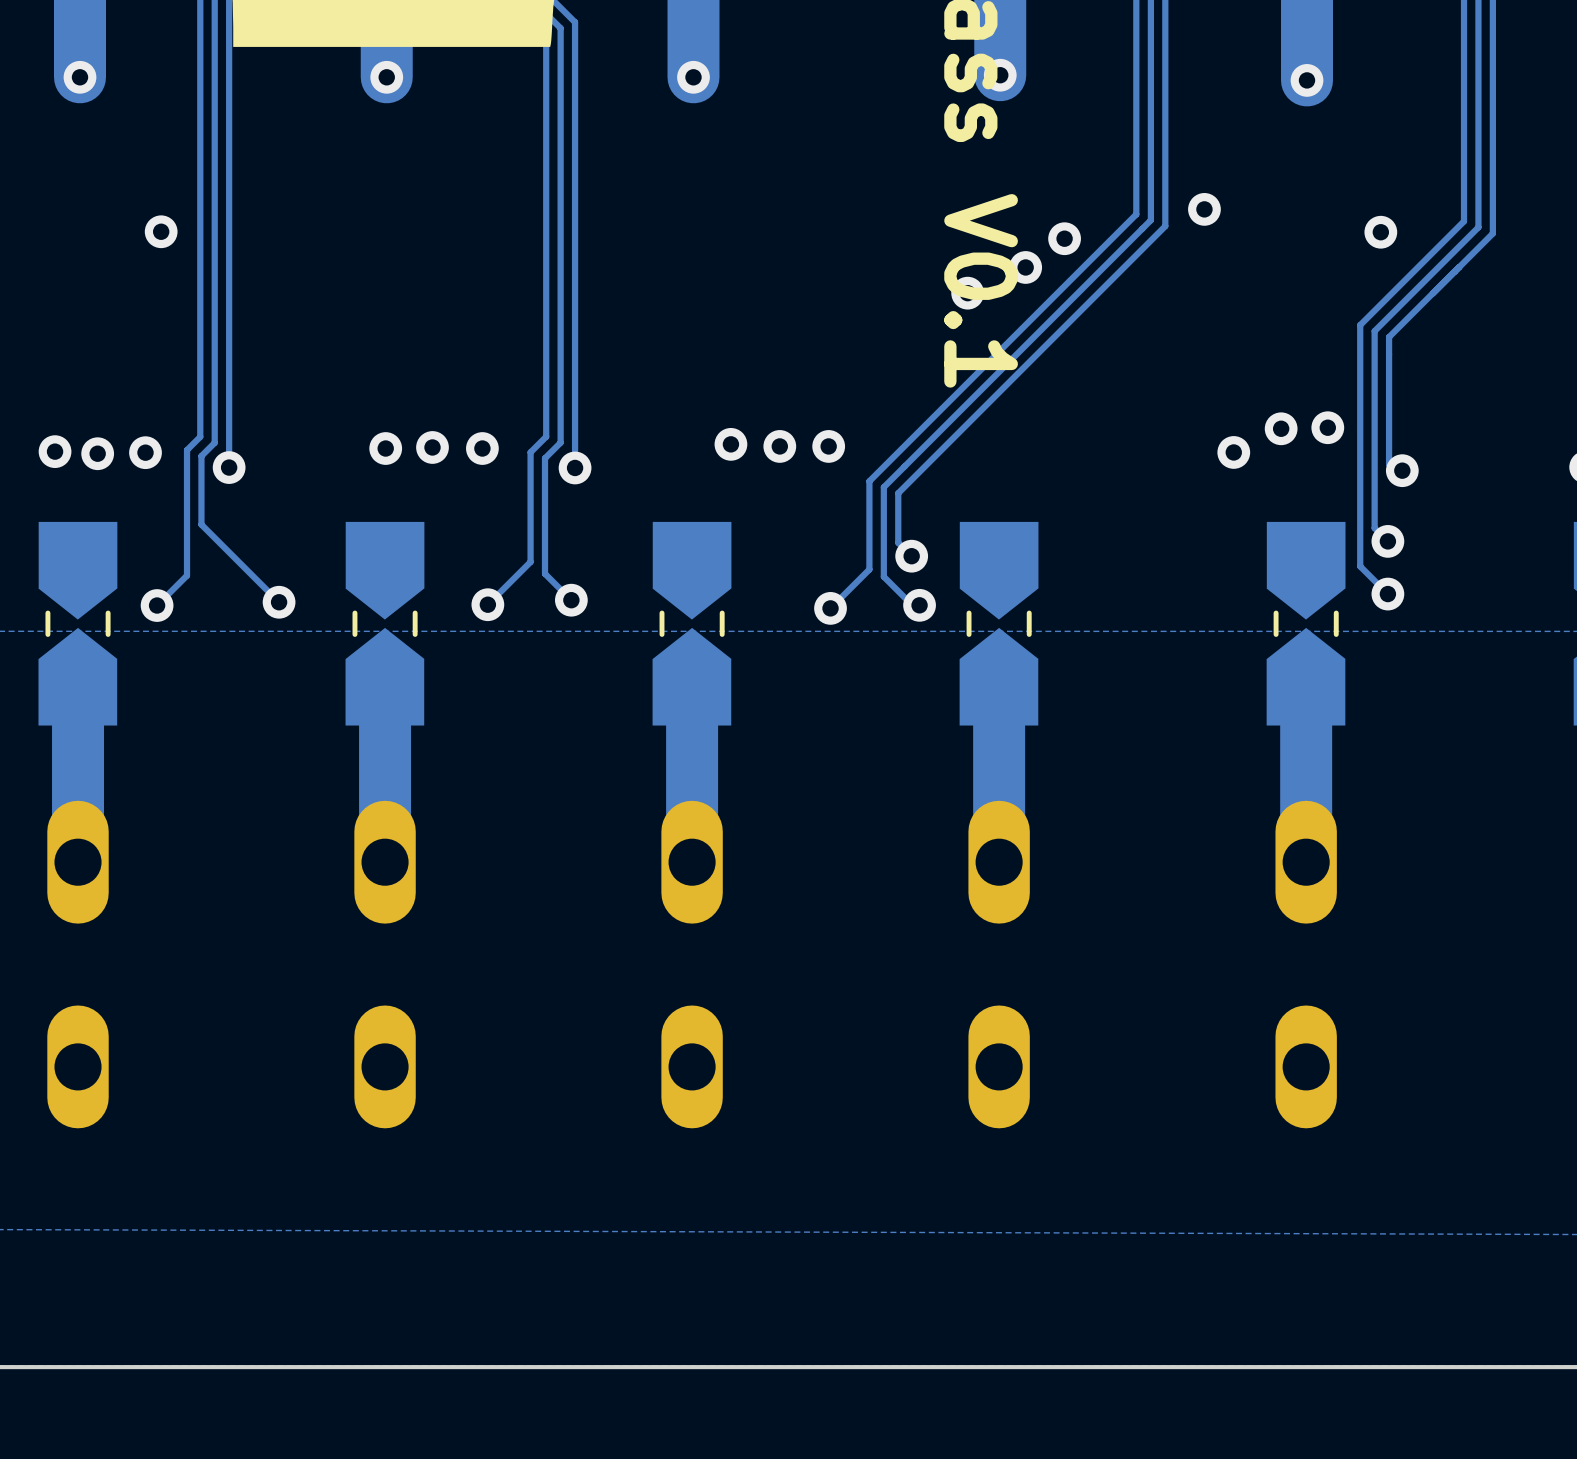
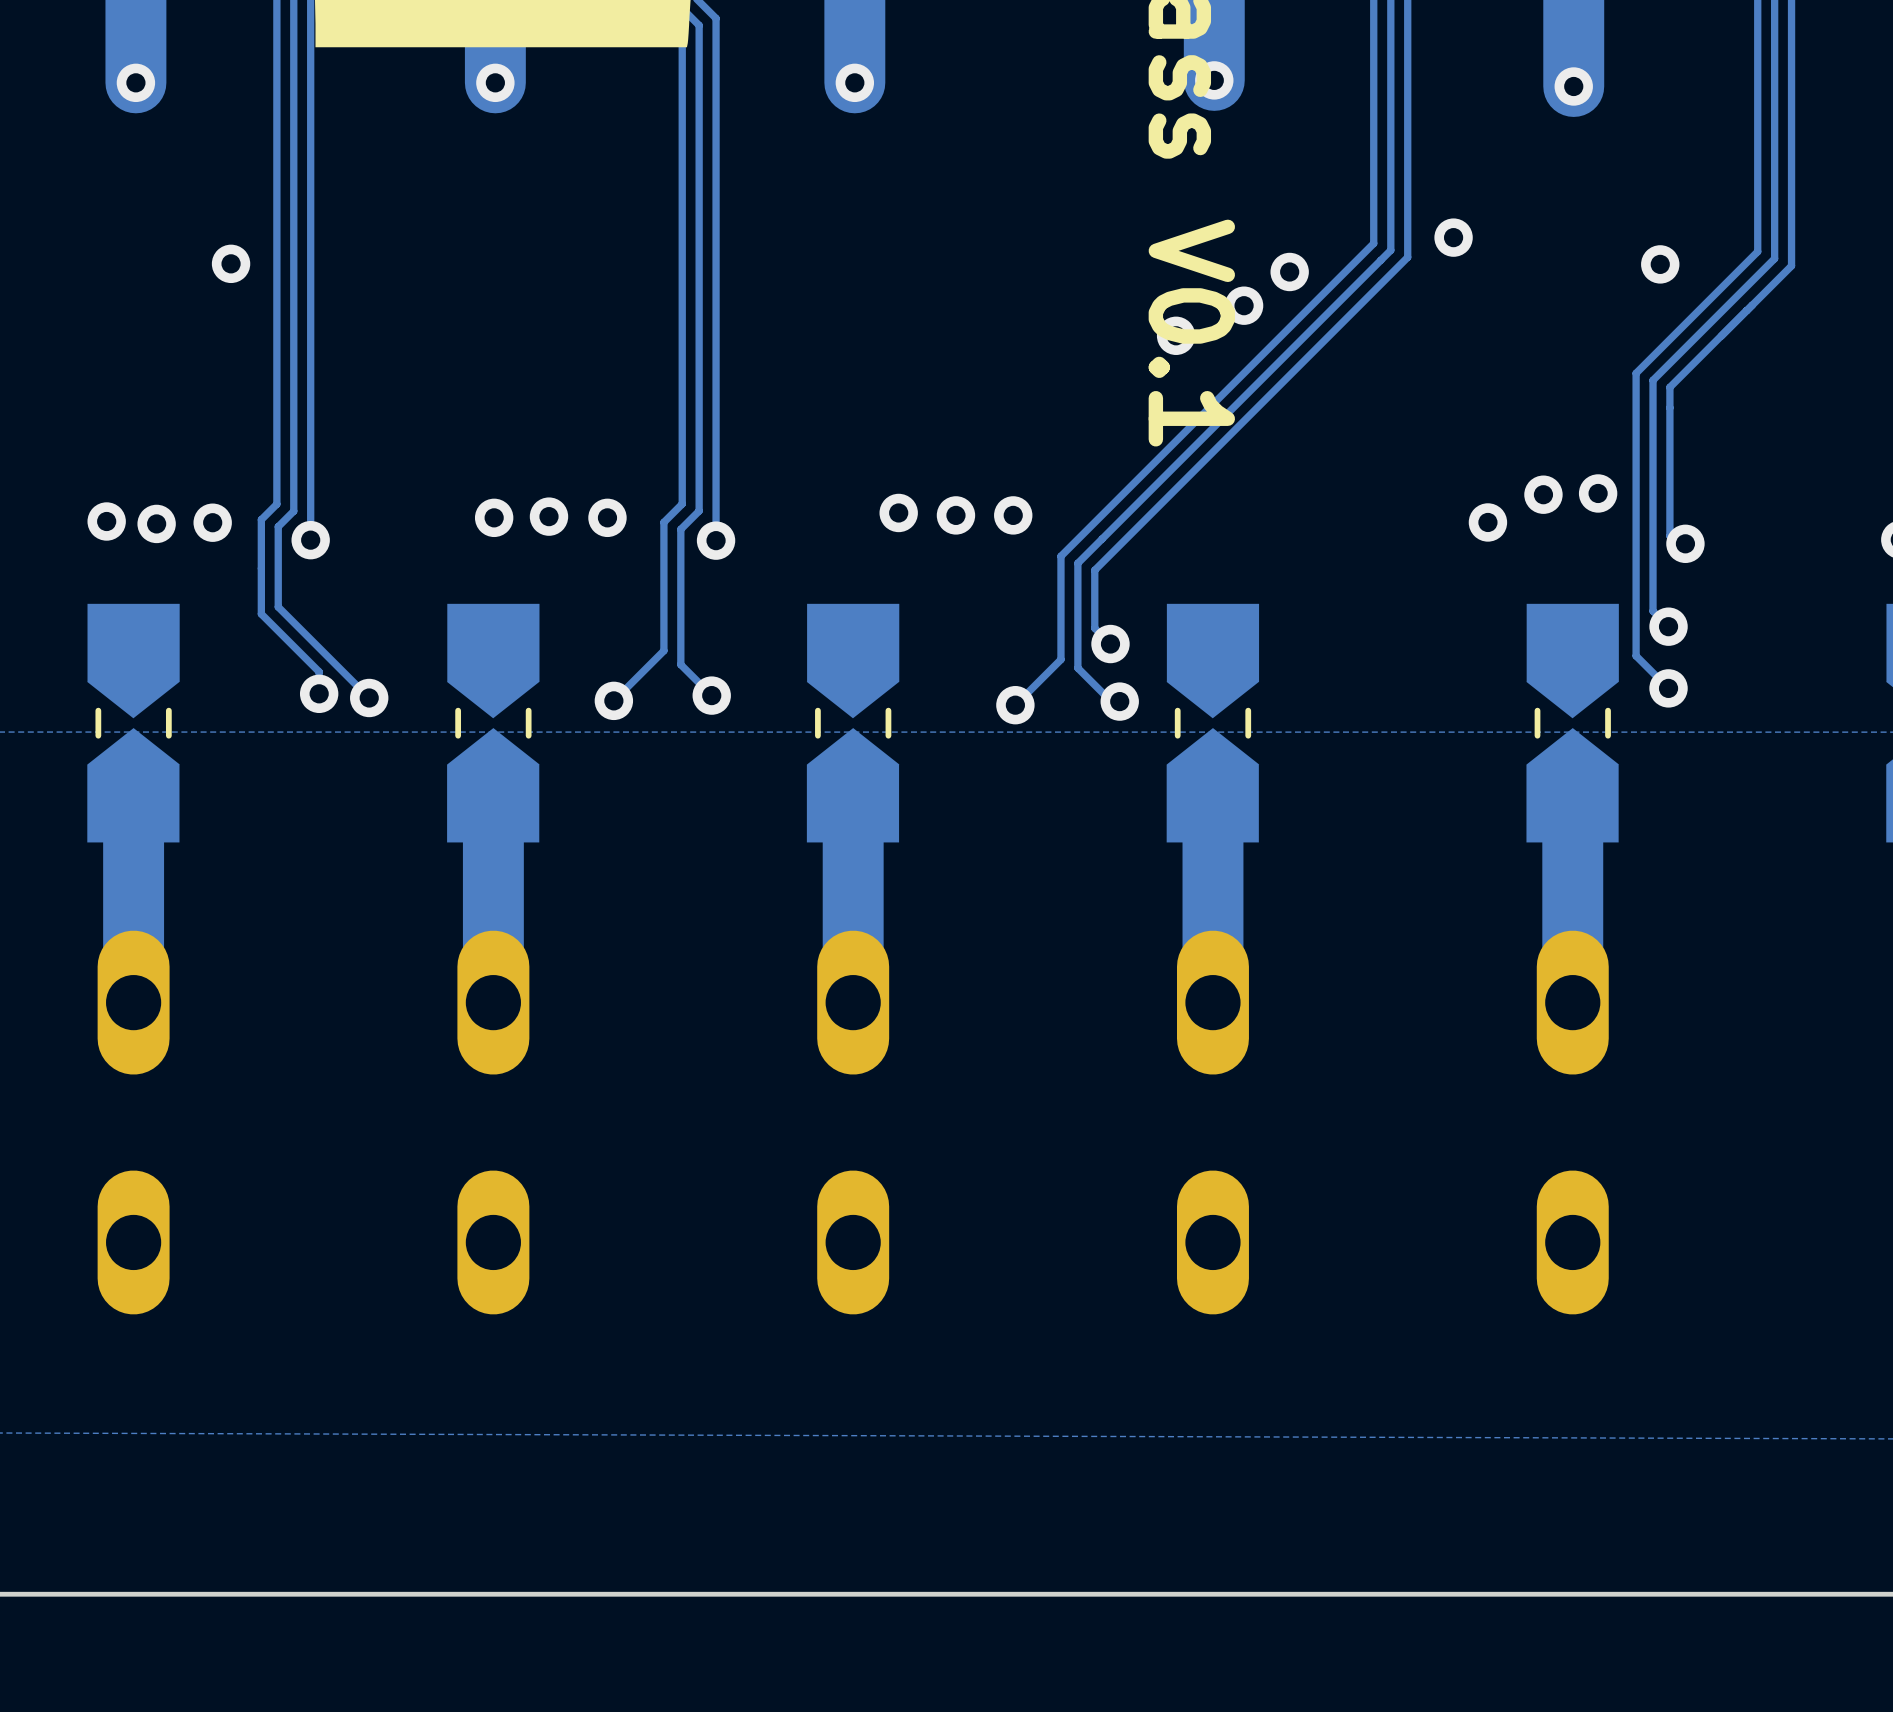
track: (187, 530) (187, 575) (157, 605) -> (261, 614) (319, 671) (319, 693)
via position: (157, 605) -> (319, 693)

